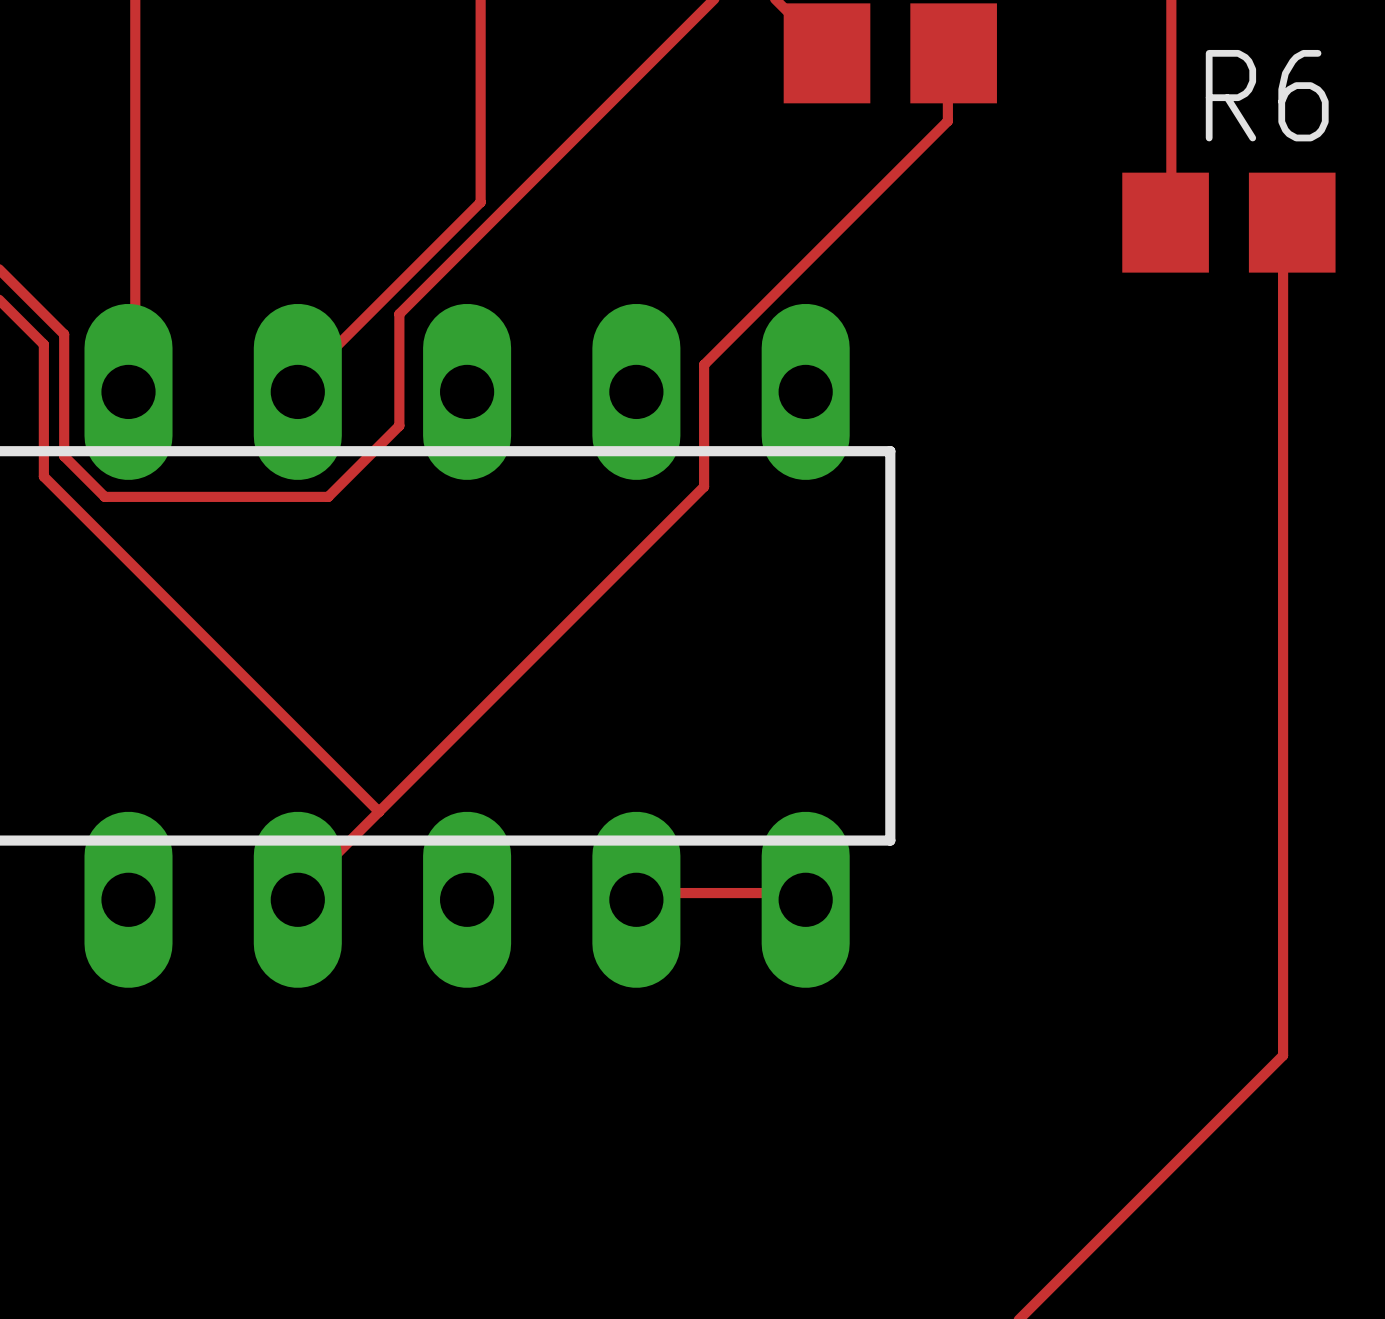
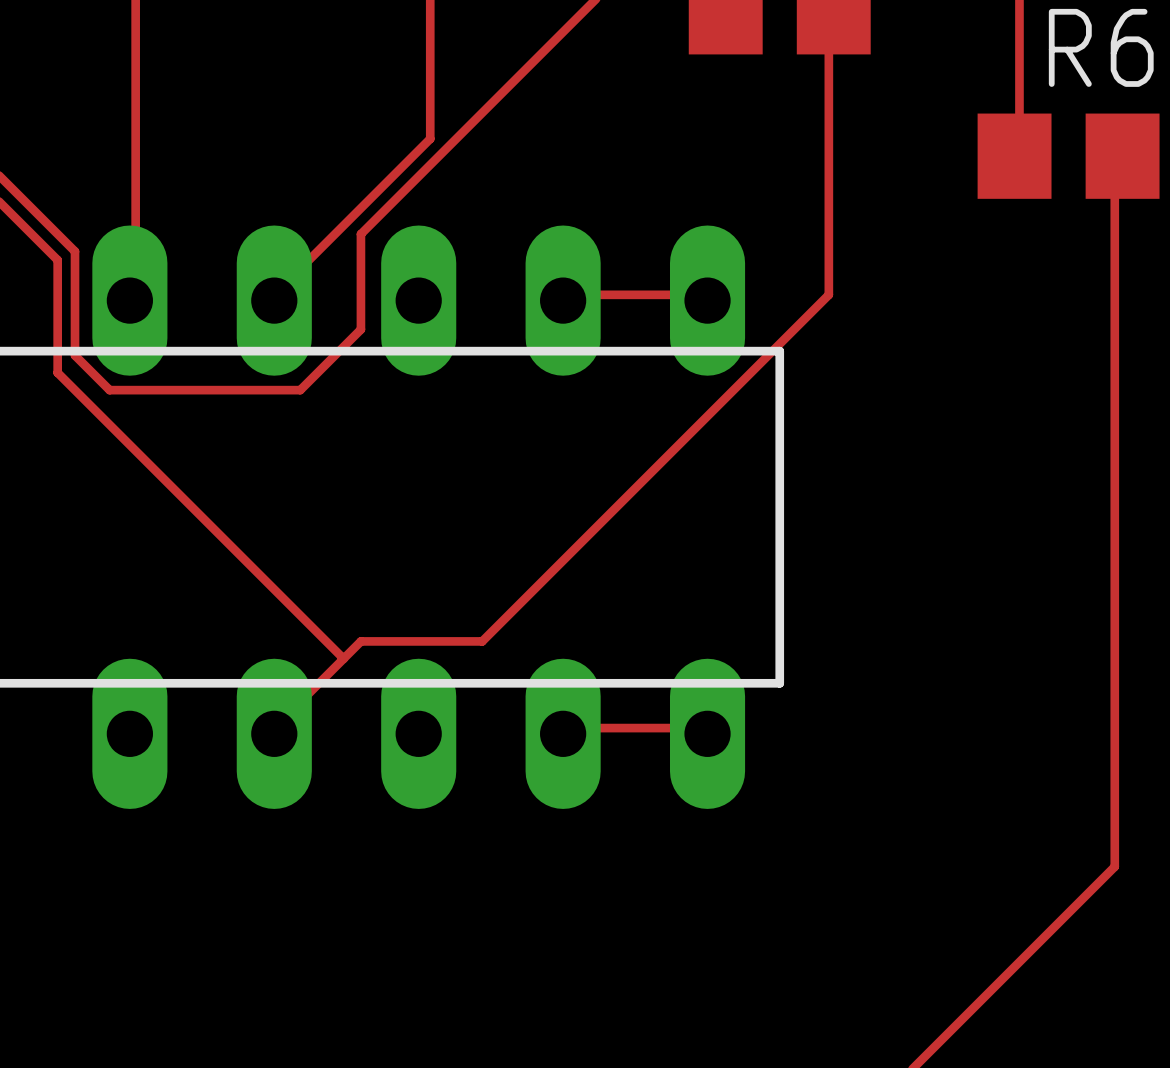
track: (947, 121) (704, 364) (704, 486) (399, 791) -> (828, 69) (828, 294) (482, 641) (360, 641)
track: none -> (563, 300) (568, 294) (707, 294) (707, 300)

